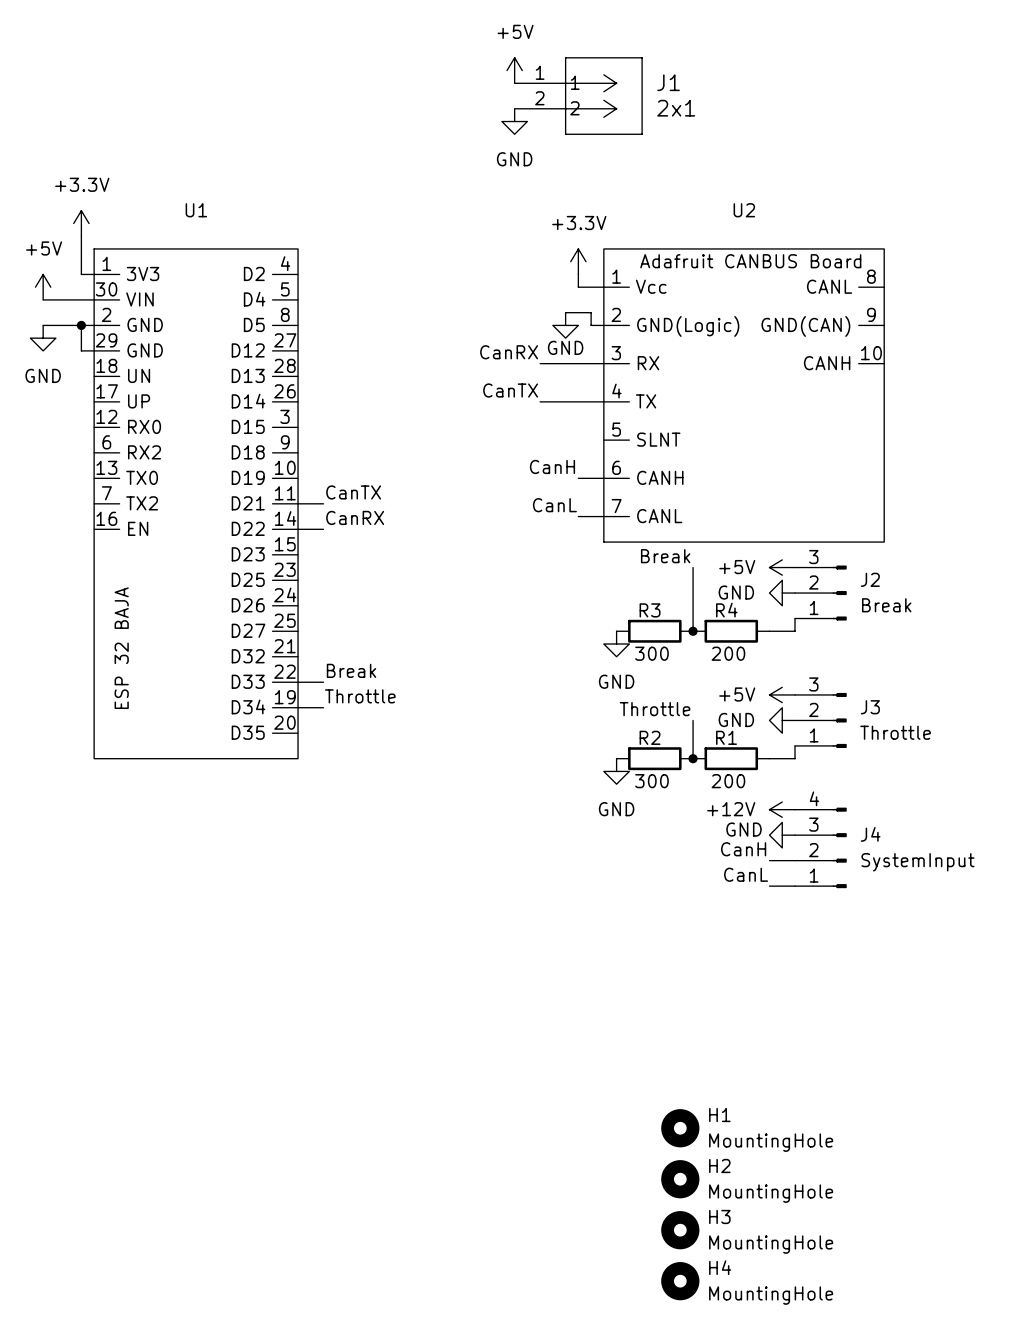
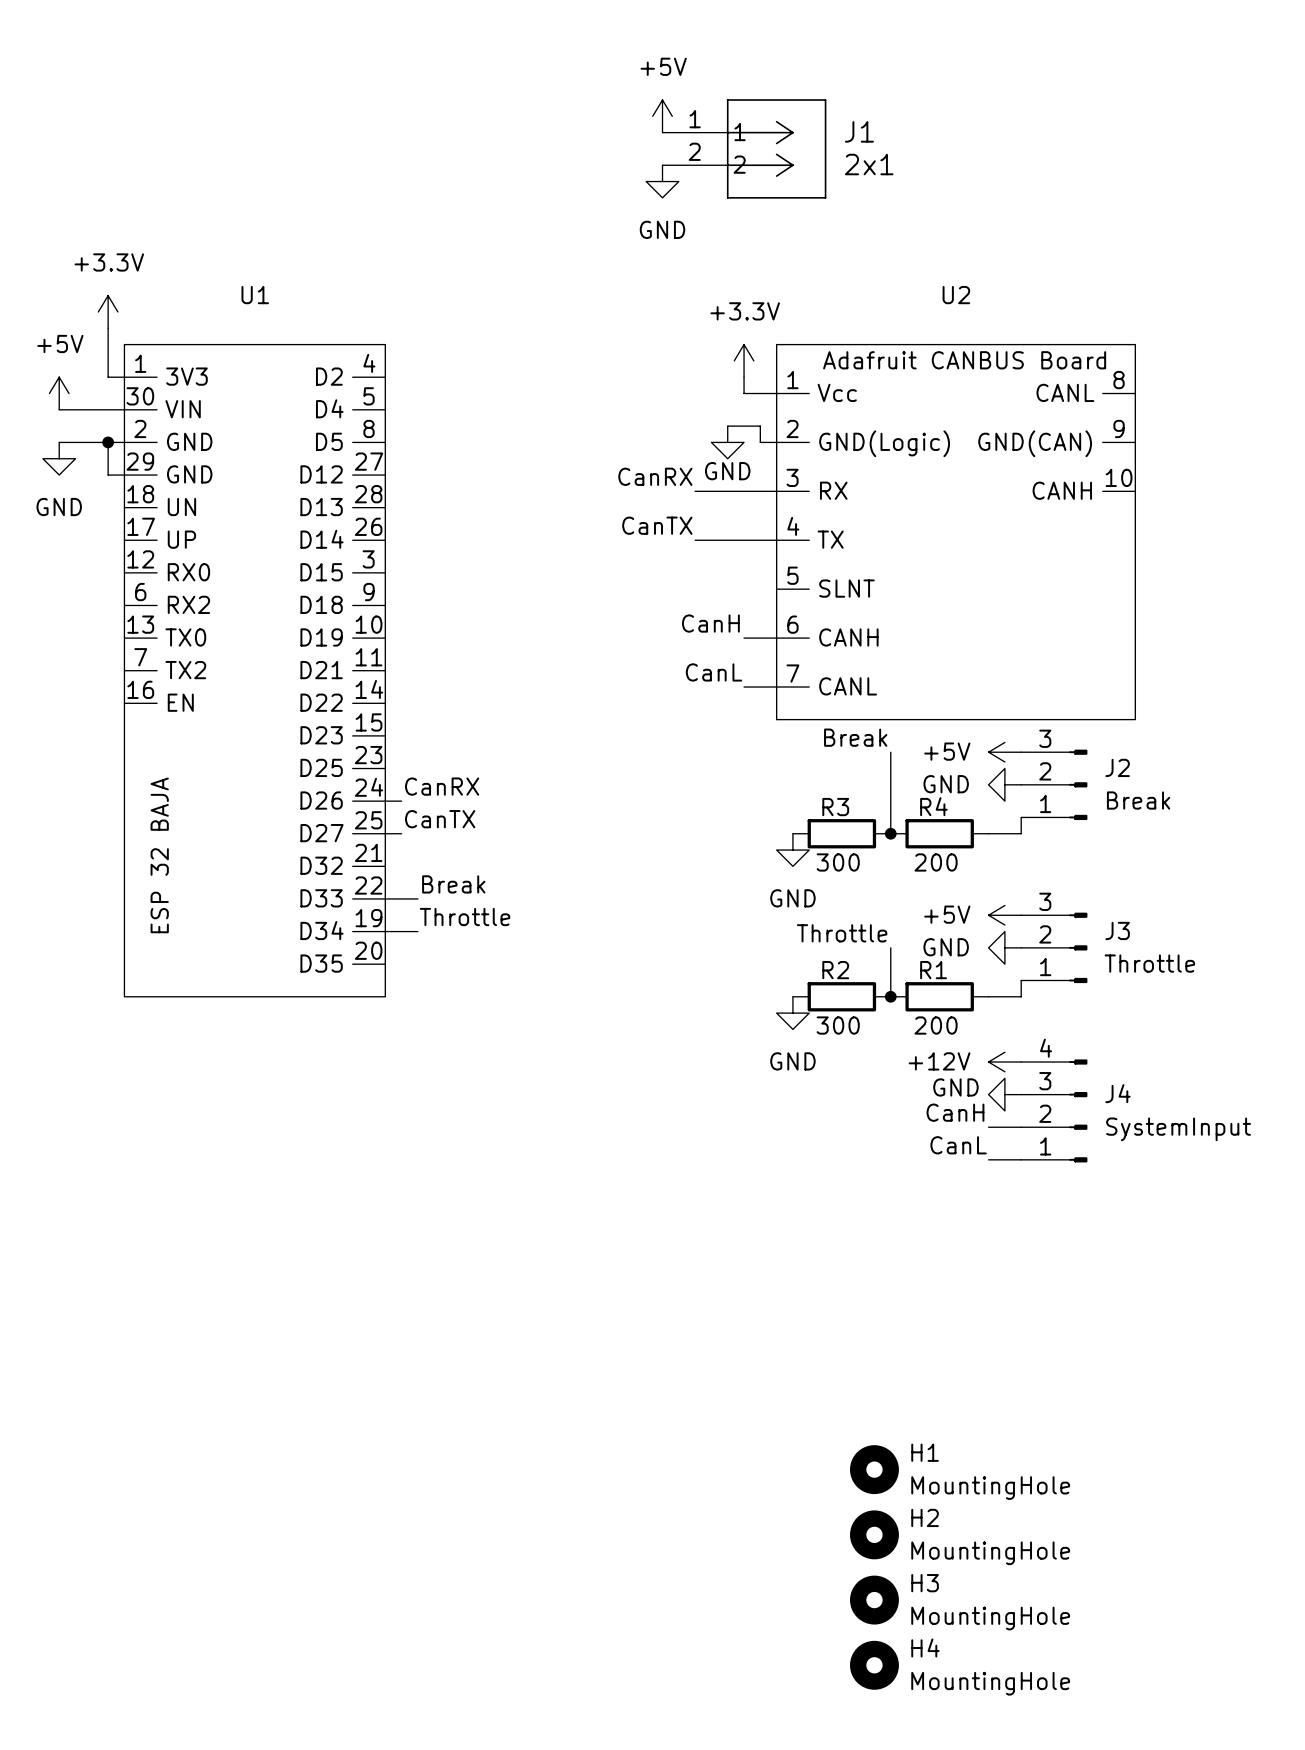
label position: CanTX (353, 492) -> CanTX (440, 819)
wire: (298, 503) (323, 503) -> none
label position: CanRX (355, 517) -> CanRX (442, 786)
wire: (298, 529) (323, 529) -> none
wire: none -> (385, 801) (401, 801)
wire: none -> (385, 833) (401, 833)

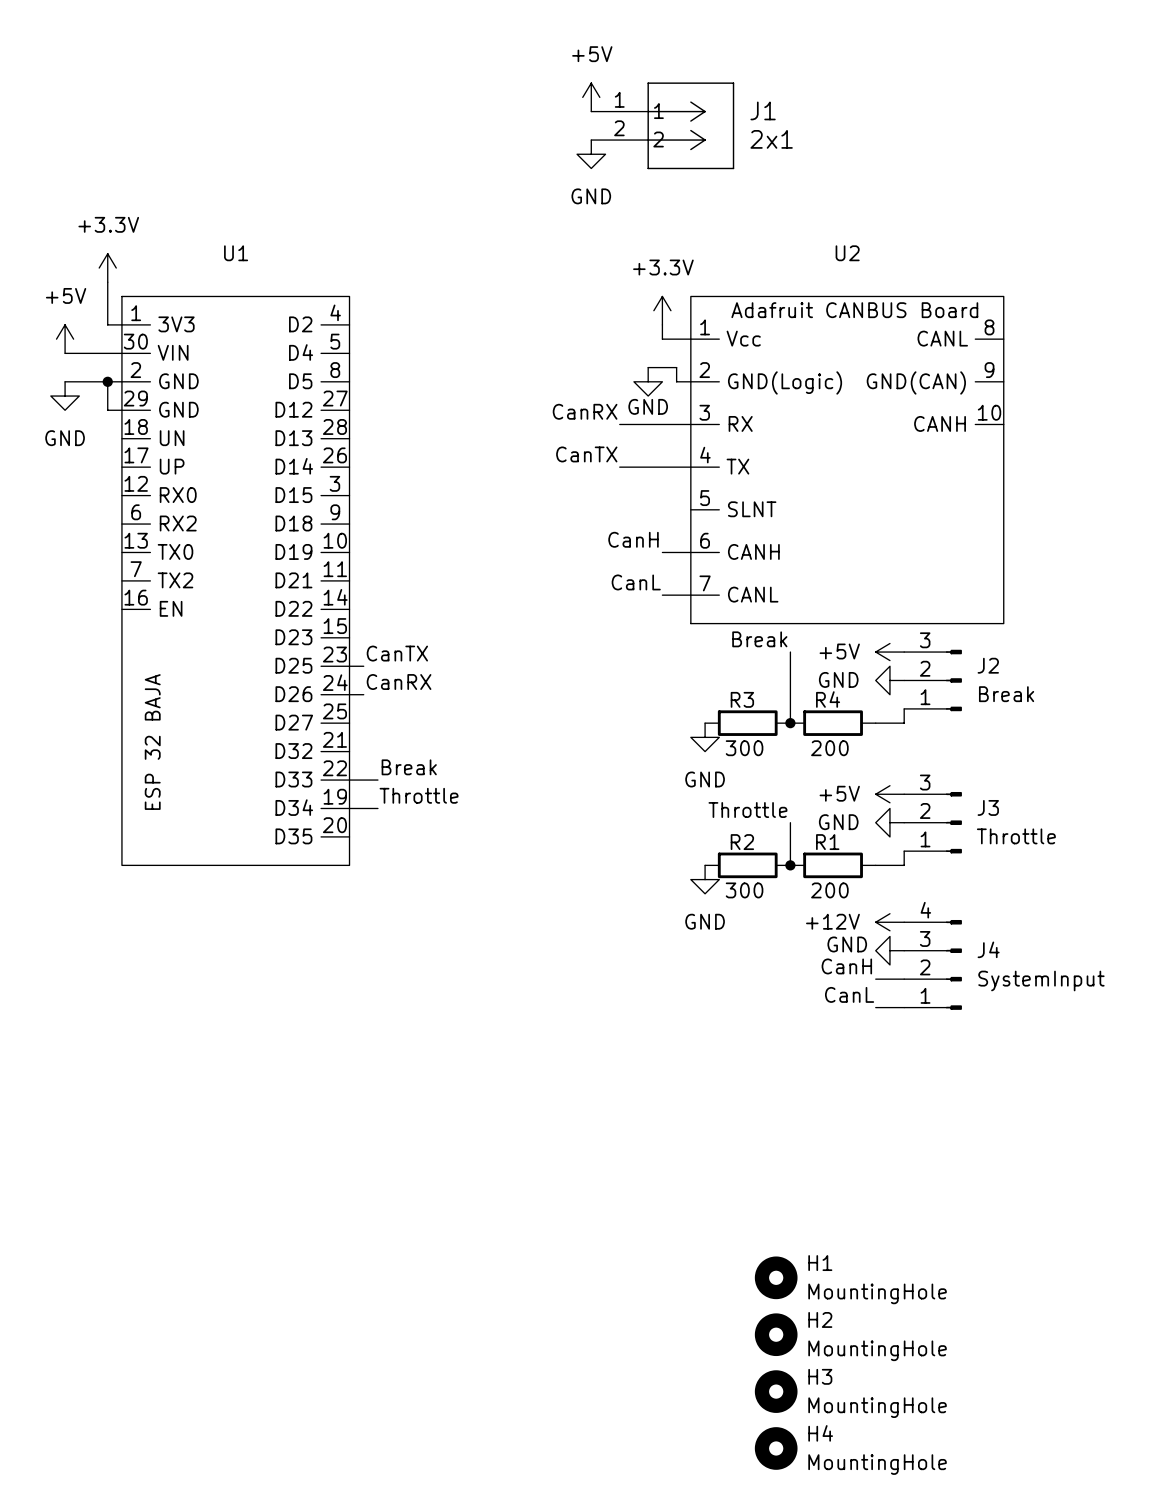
label position: CanTX (440, 819) -> CanTX (397, 653)
wire: (385, 833) (401, 833) -> (349, 666) (363, 666)

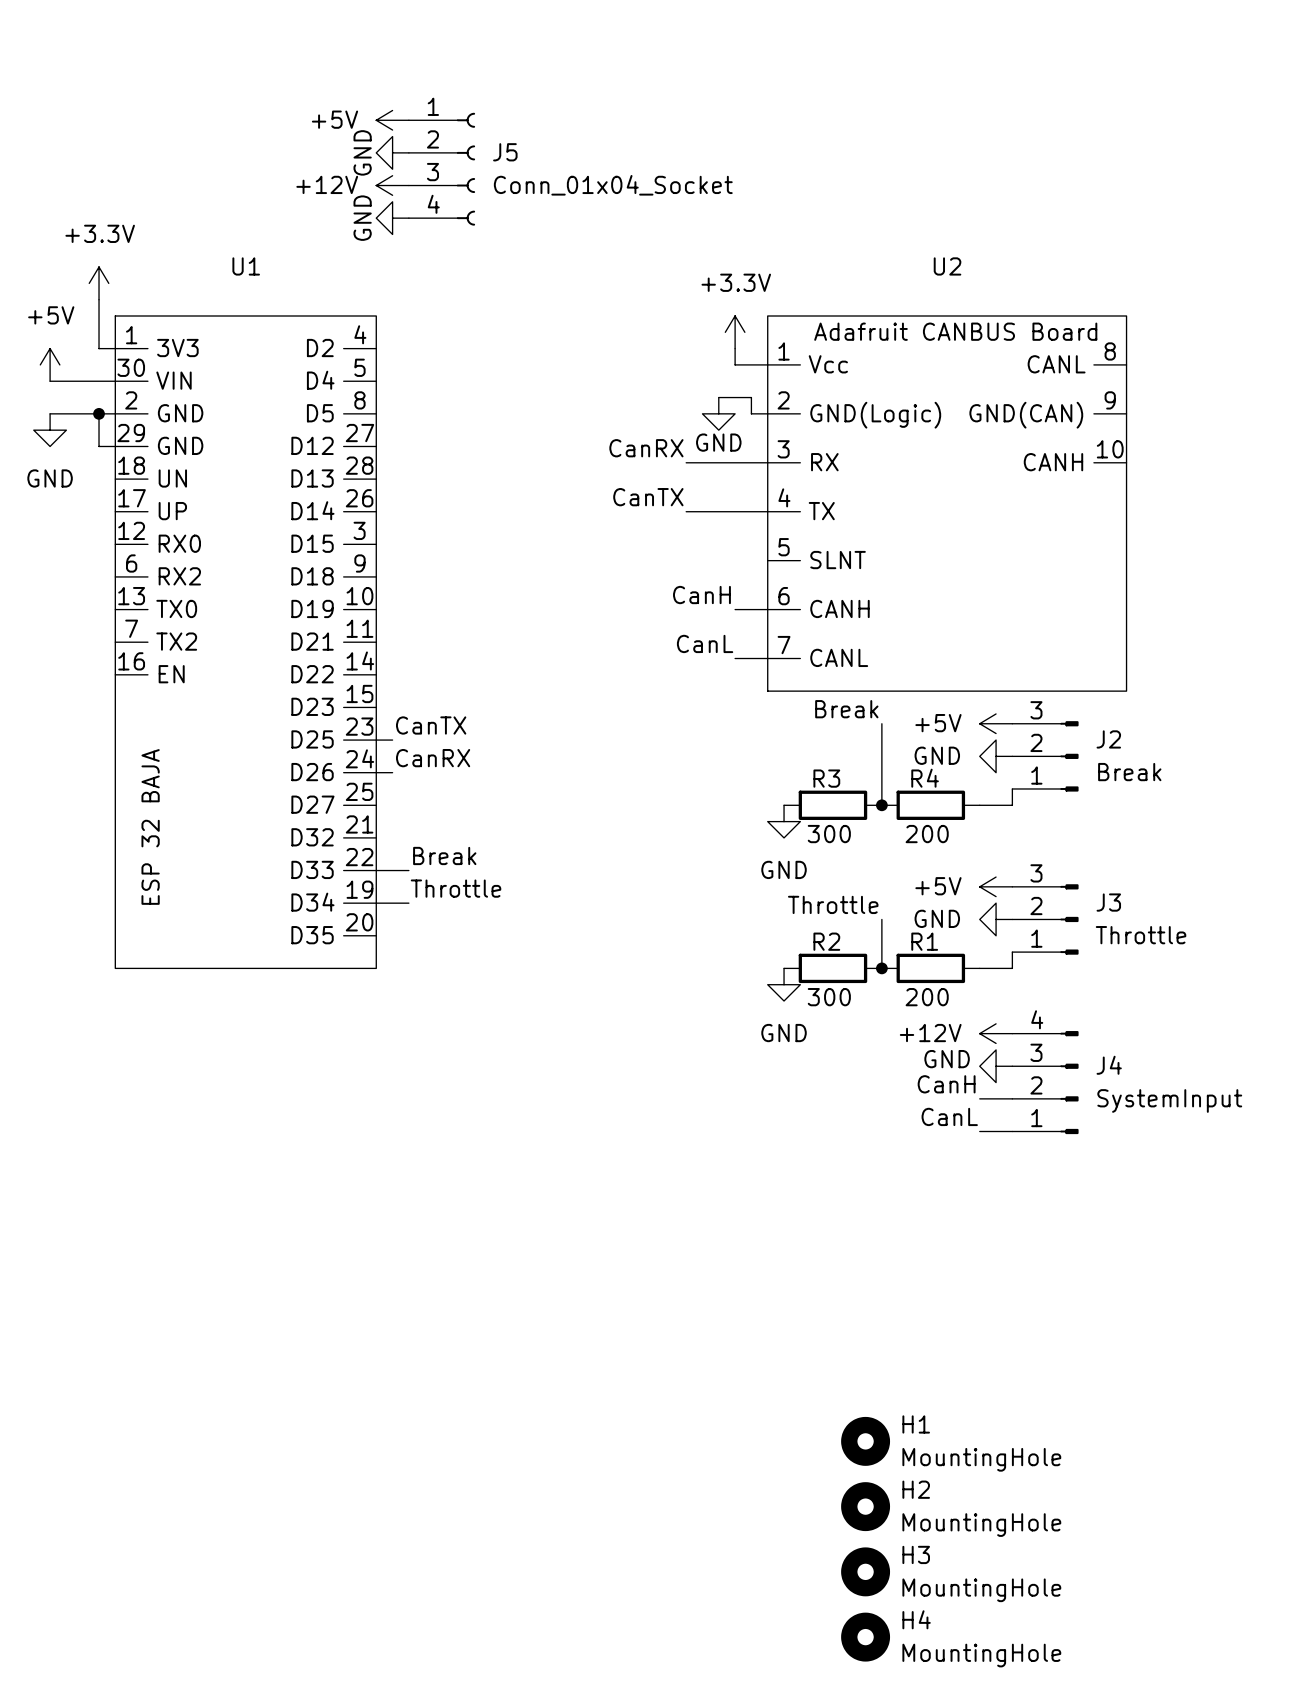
power symbol rotation: 0° (591, 97) -> 90° counterclockwise (392, 120)
power symbol position: +5V (591, 97) -> +5V (392, 120)
J1: 2x1 (662, 125) -> none
power symbol: none -> GND (392, 152)
power symbol: GND (591, 154) -> none
J5: none -> Conn_01x04_Socket (442, 169)
power symbol: none -> +12V (392, 185)
power symbol: none -> GND (392, 218)

